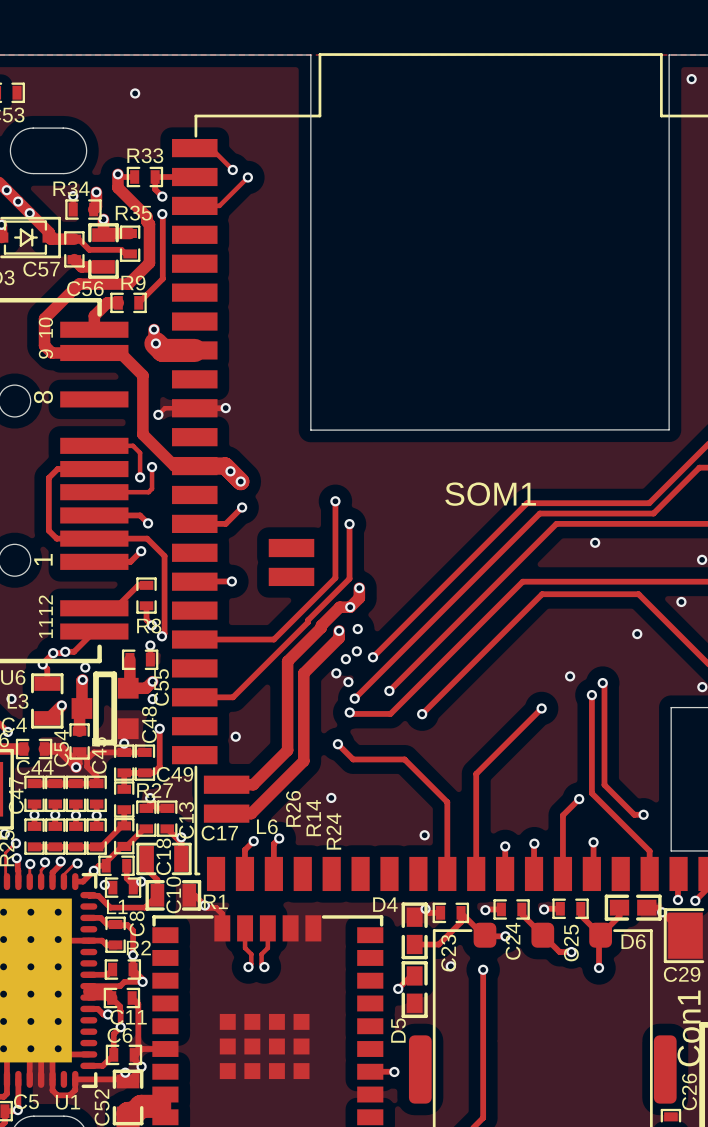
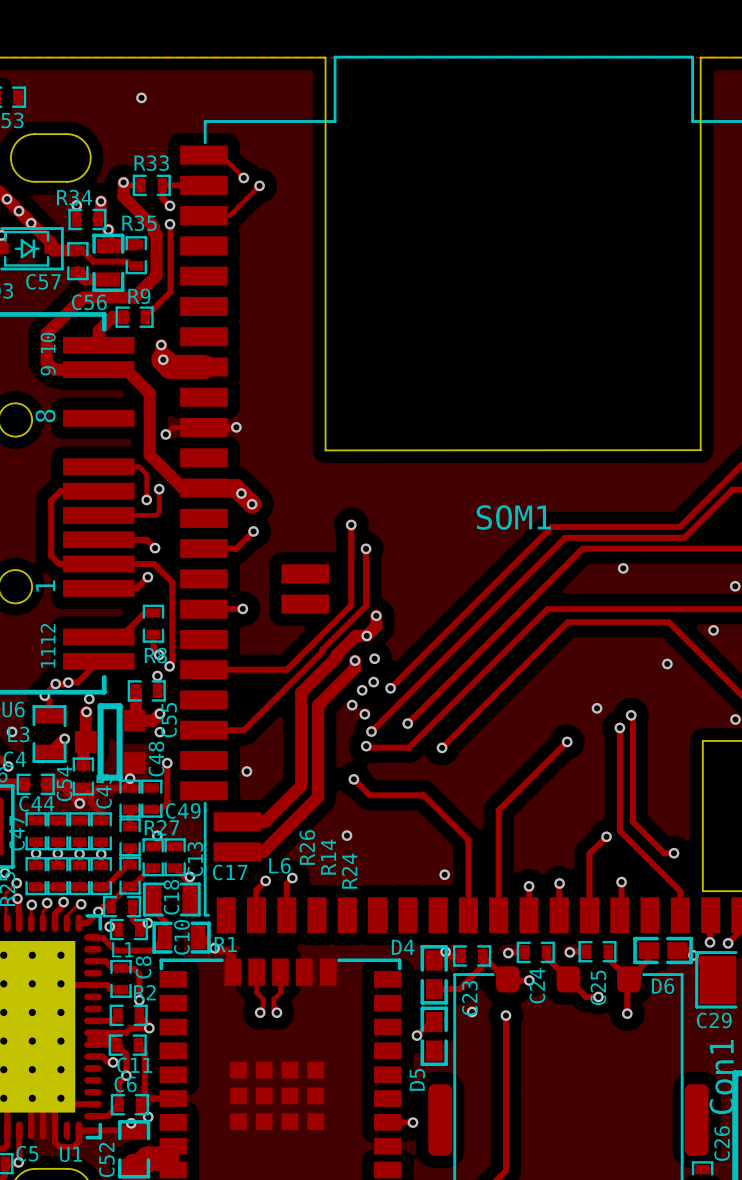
via: (691, 79) -> none

